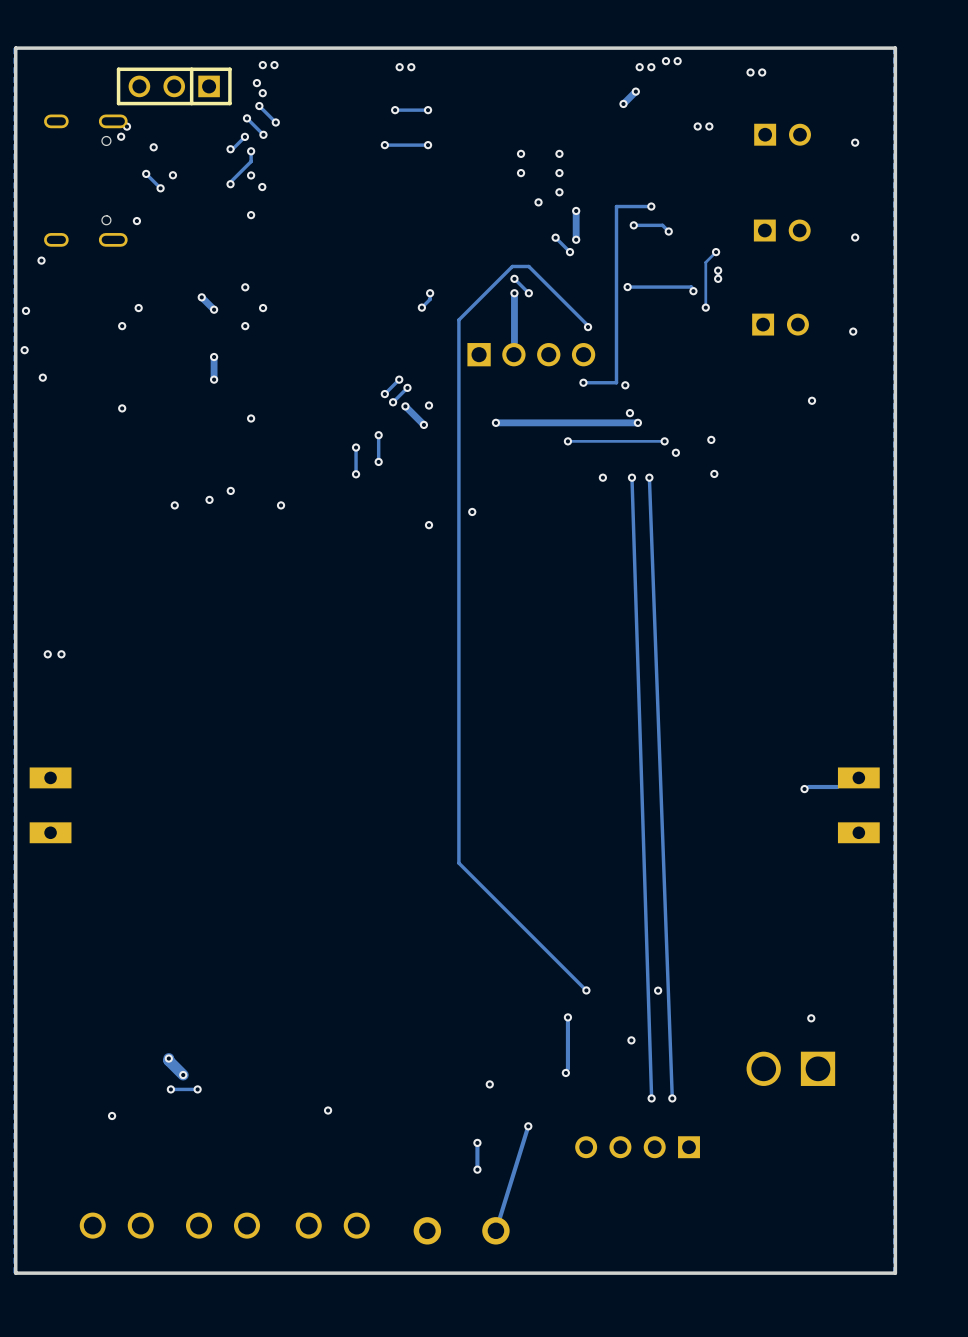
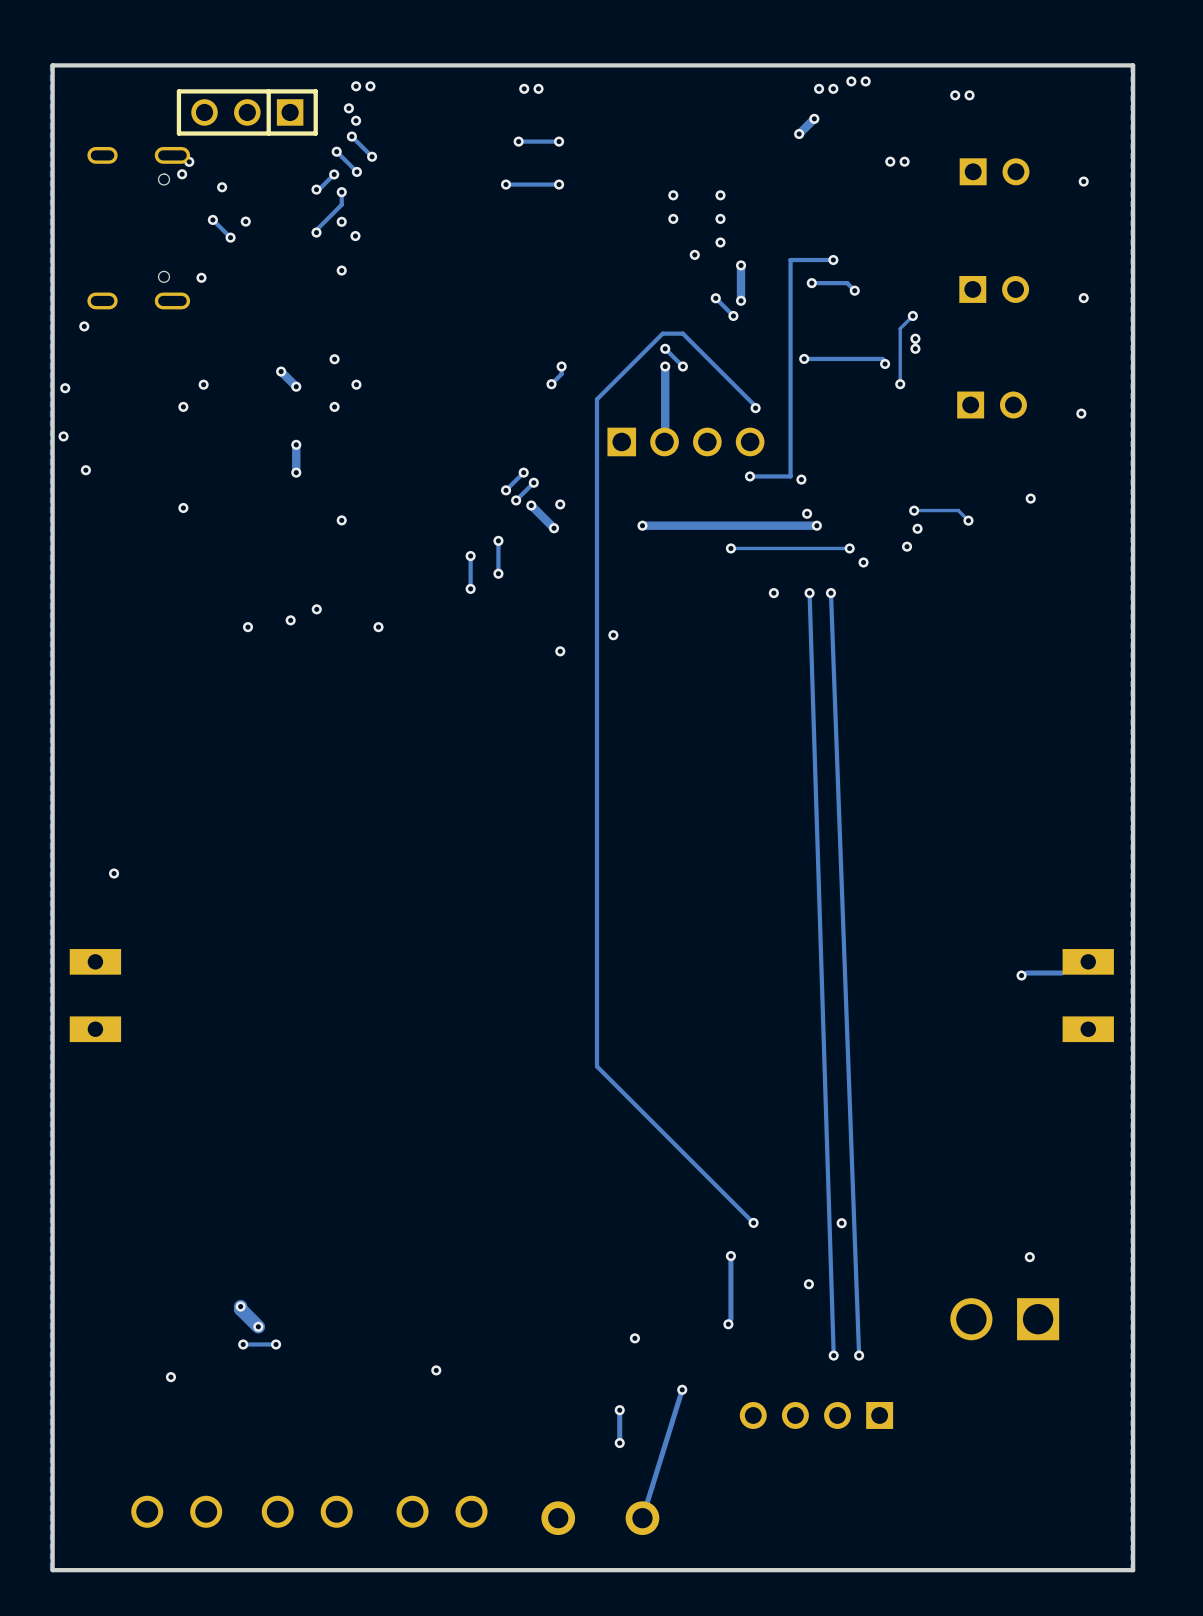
via: none -> (914, 510)
track: none -> (920, 510) (958, 510) (968, 520)
via: none -> (968, 520)
via: none -> (917, 528)
via: (714, 473) -> none
via: (47, 654) -> none
via: (61, 654) -> none
via: none -> (114, 873)

